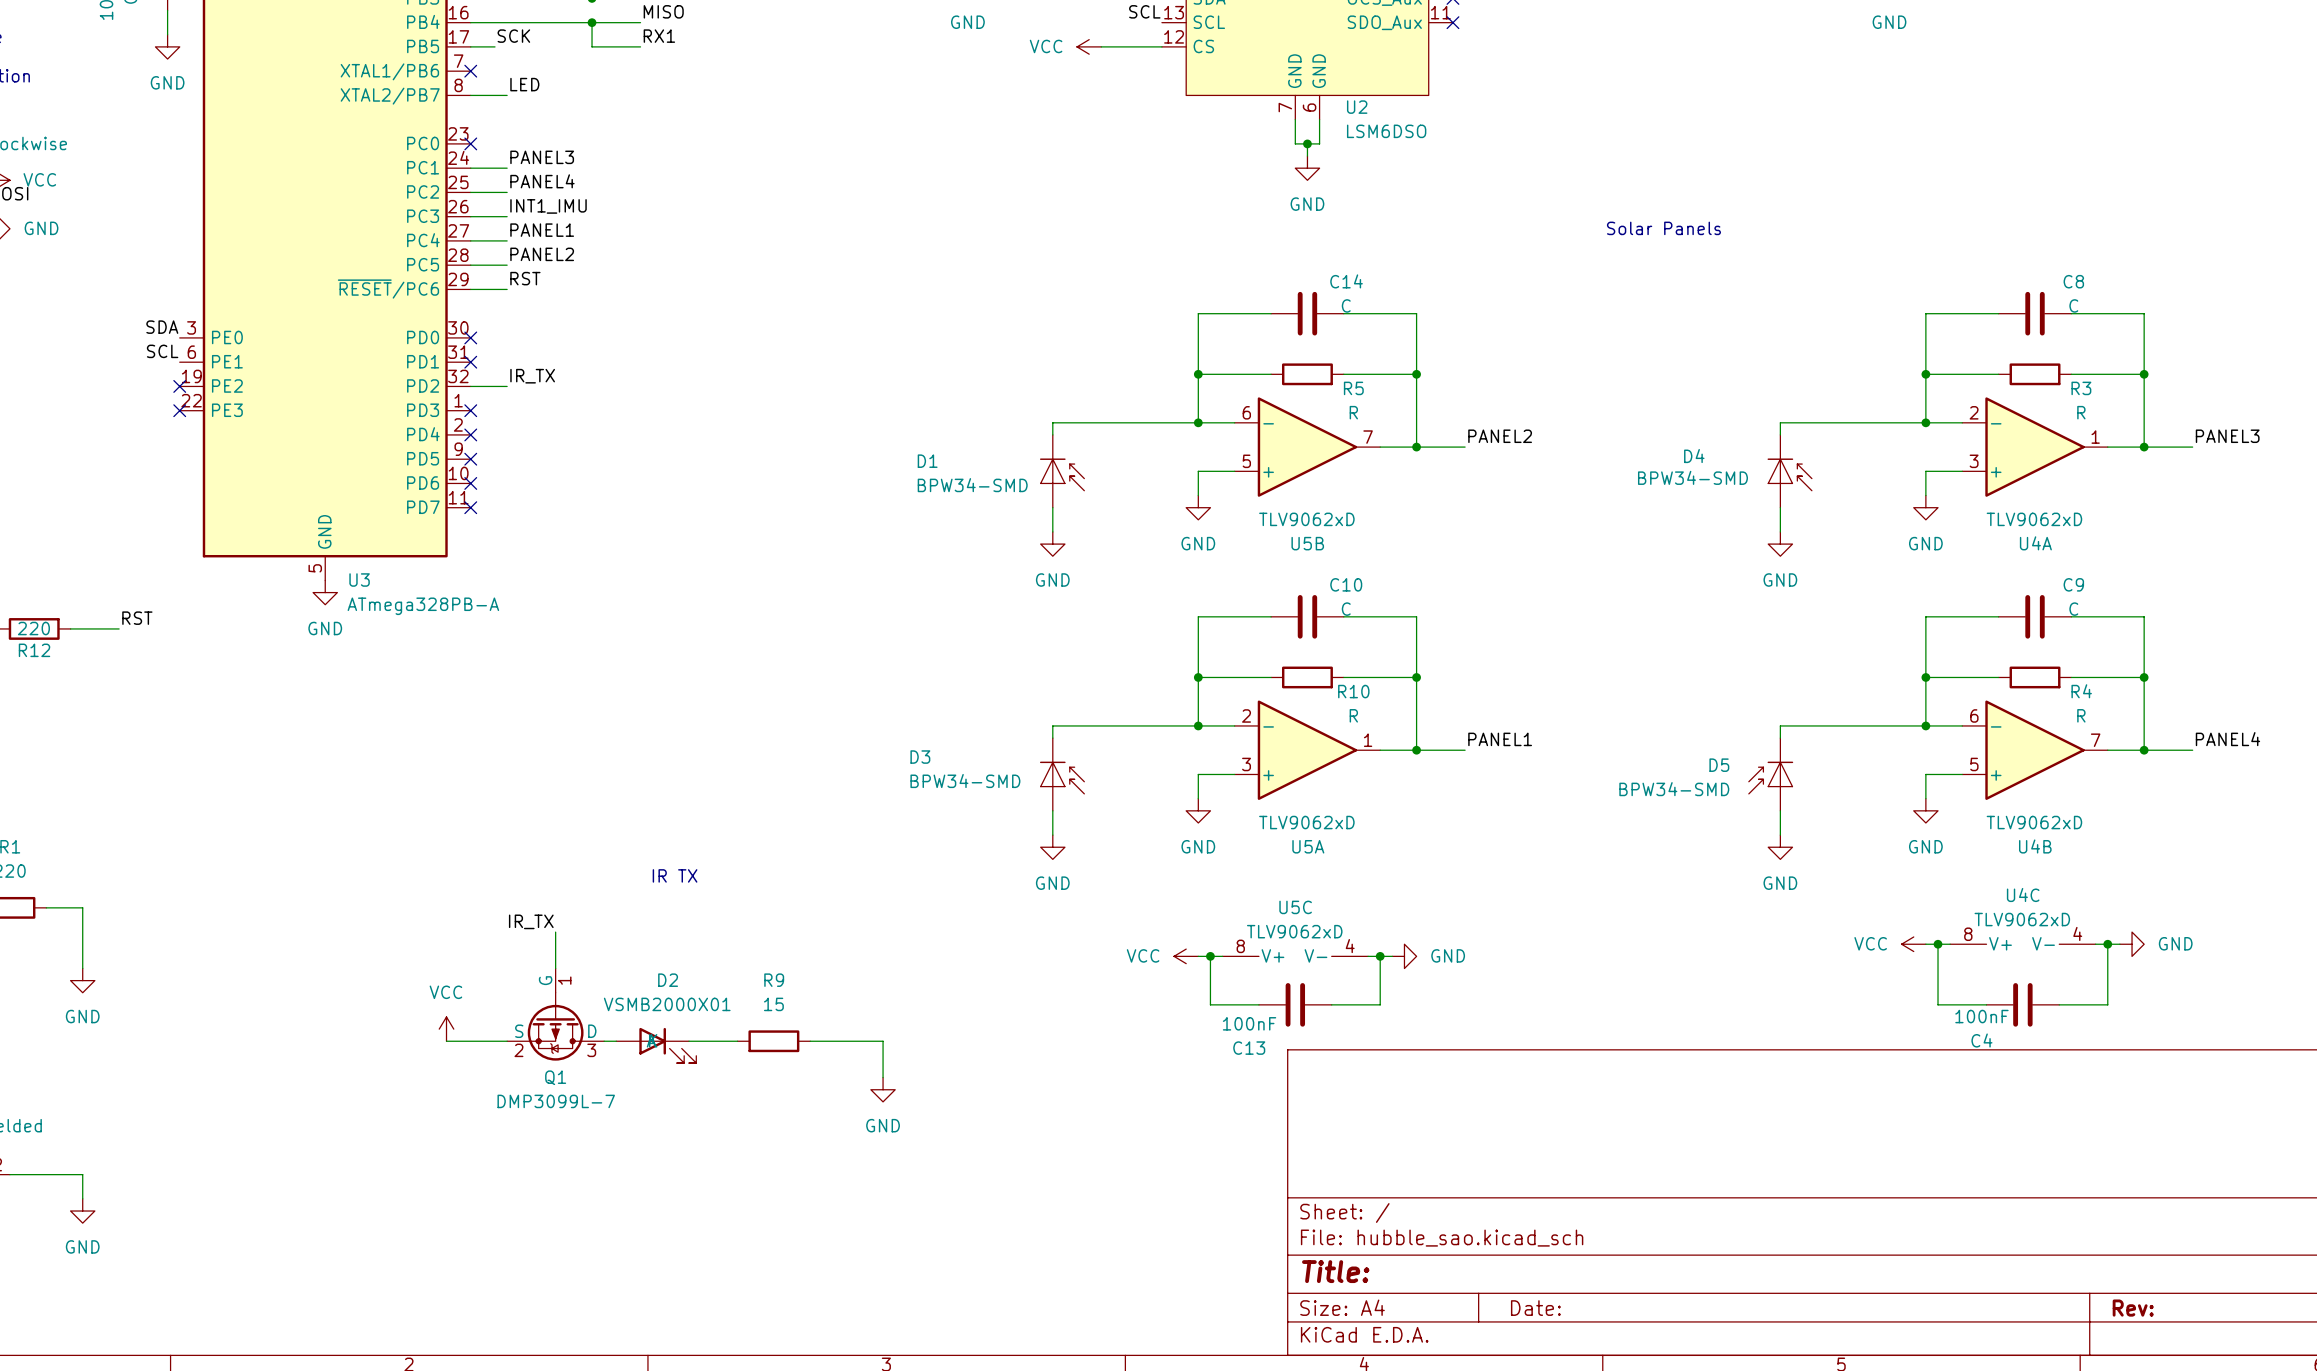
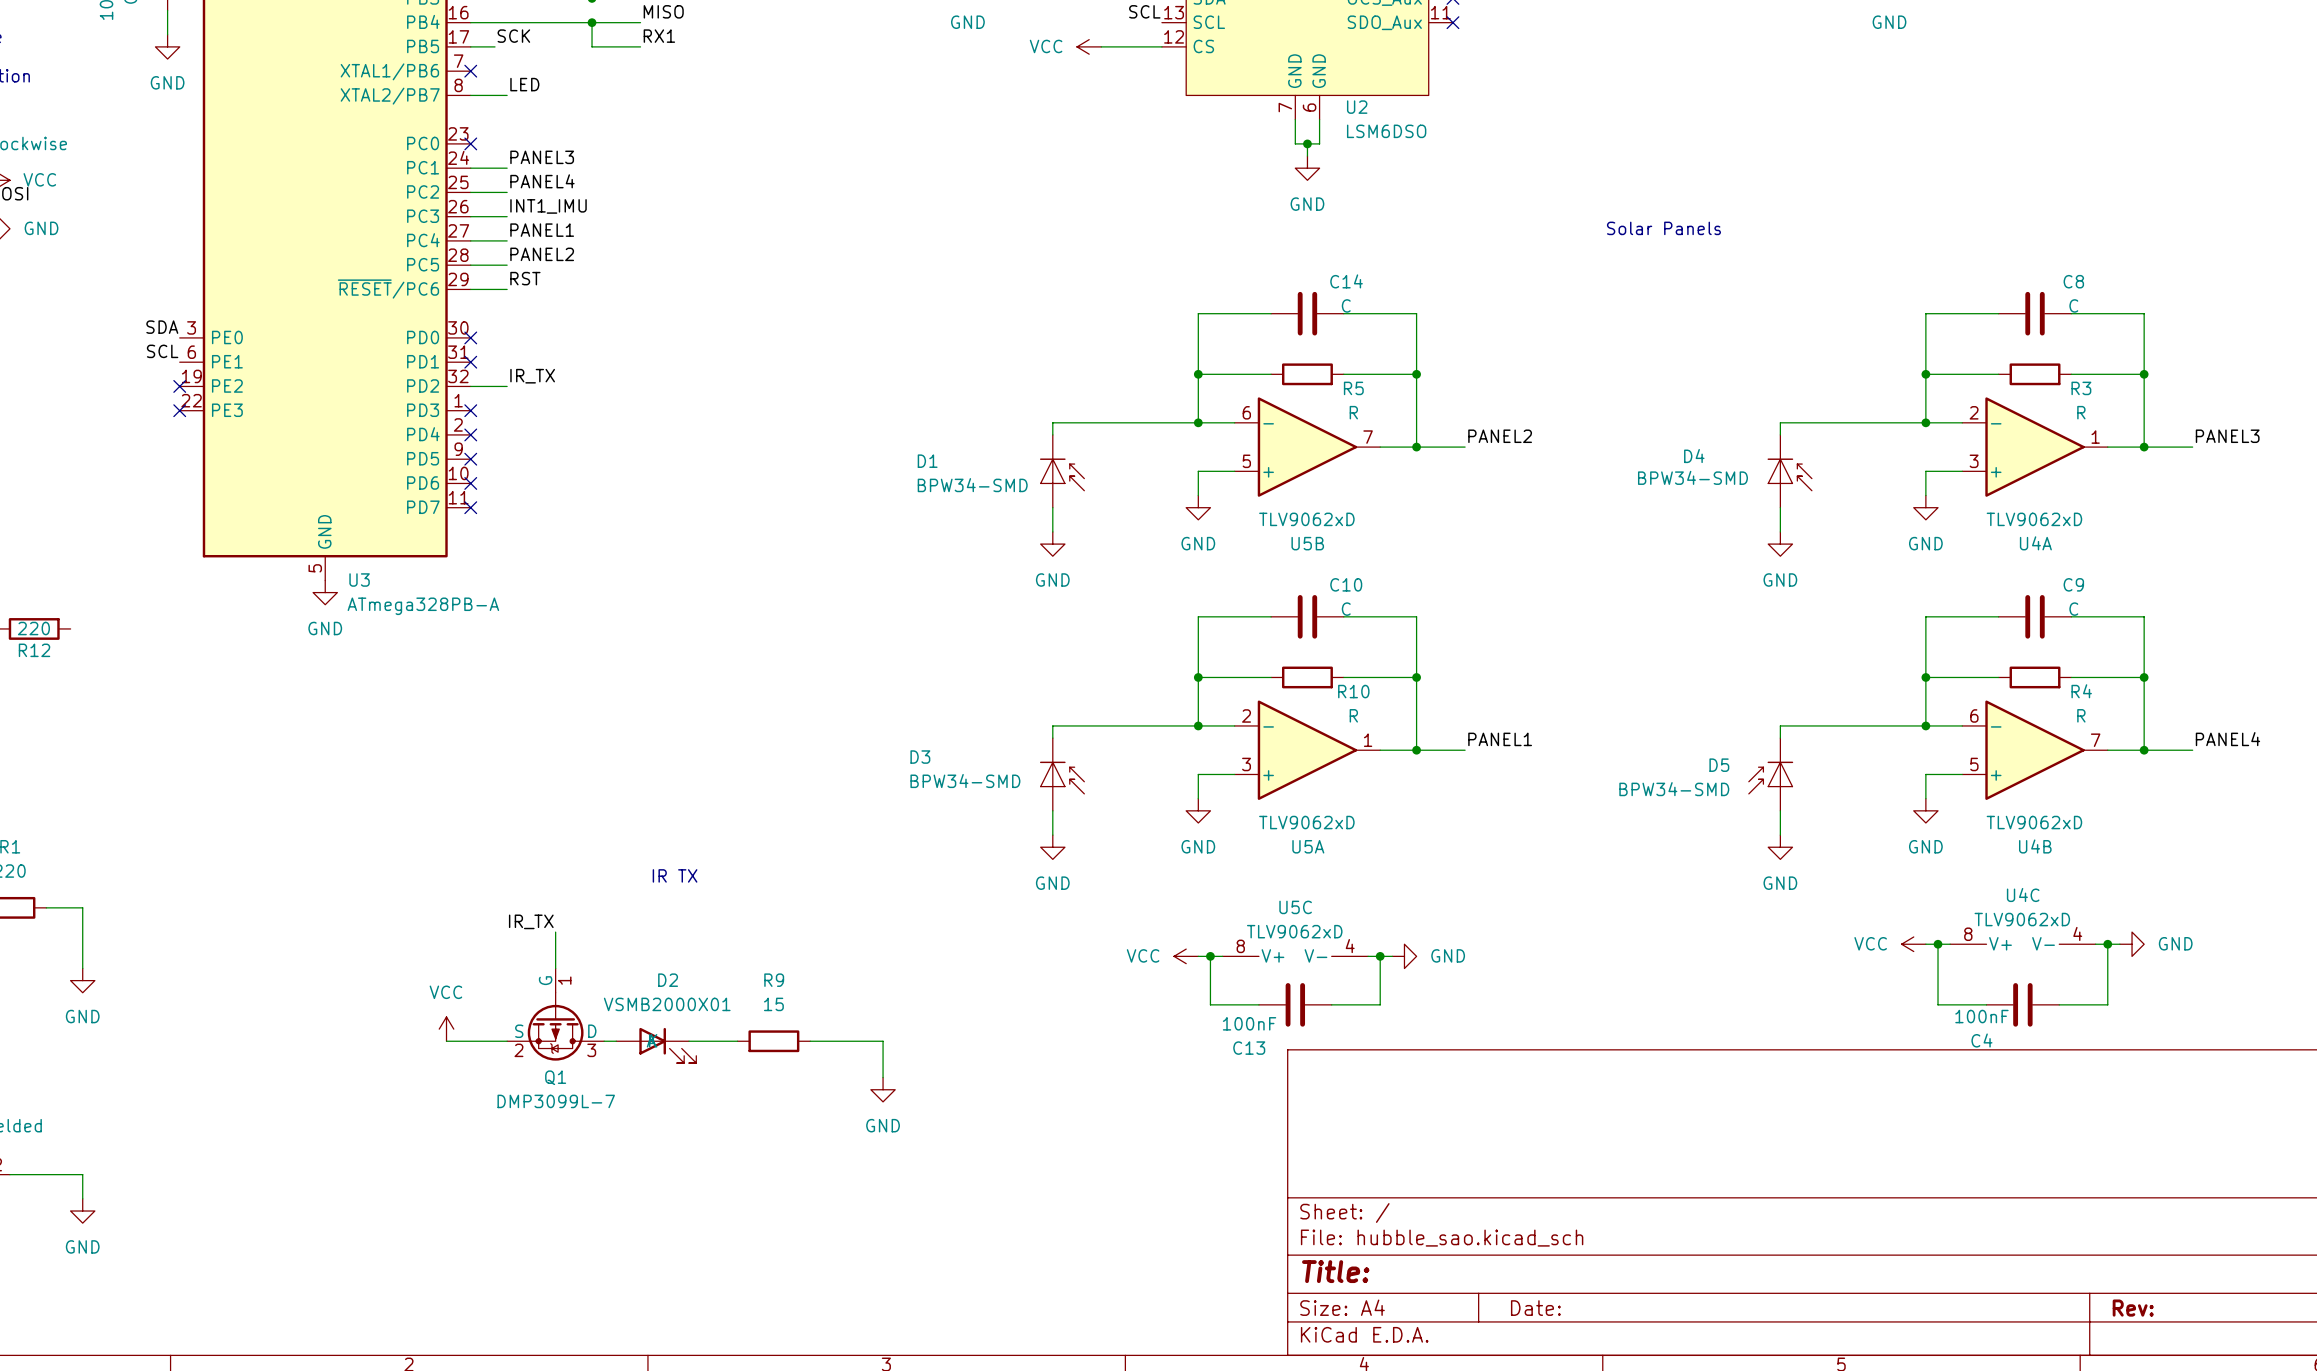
label: RST (137, 618) -> none
wire: (70, 628) (119, 628) -> none

